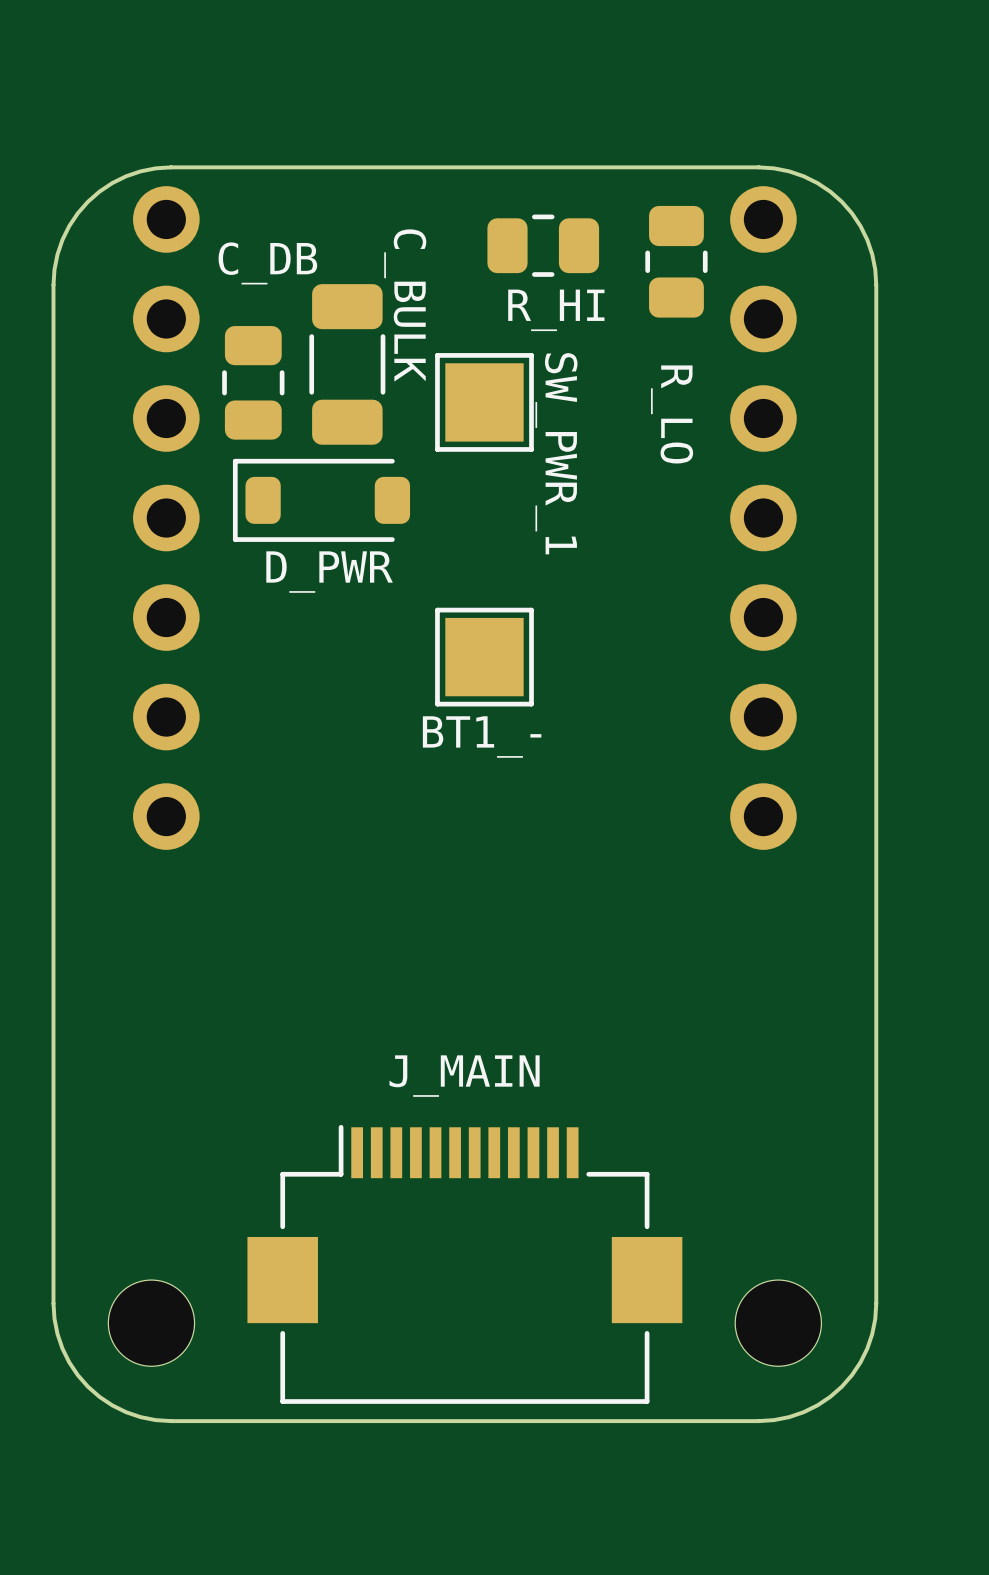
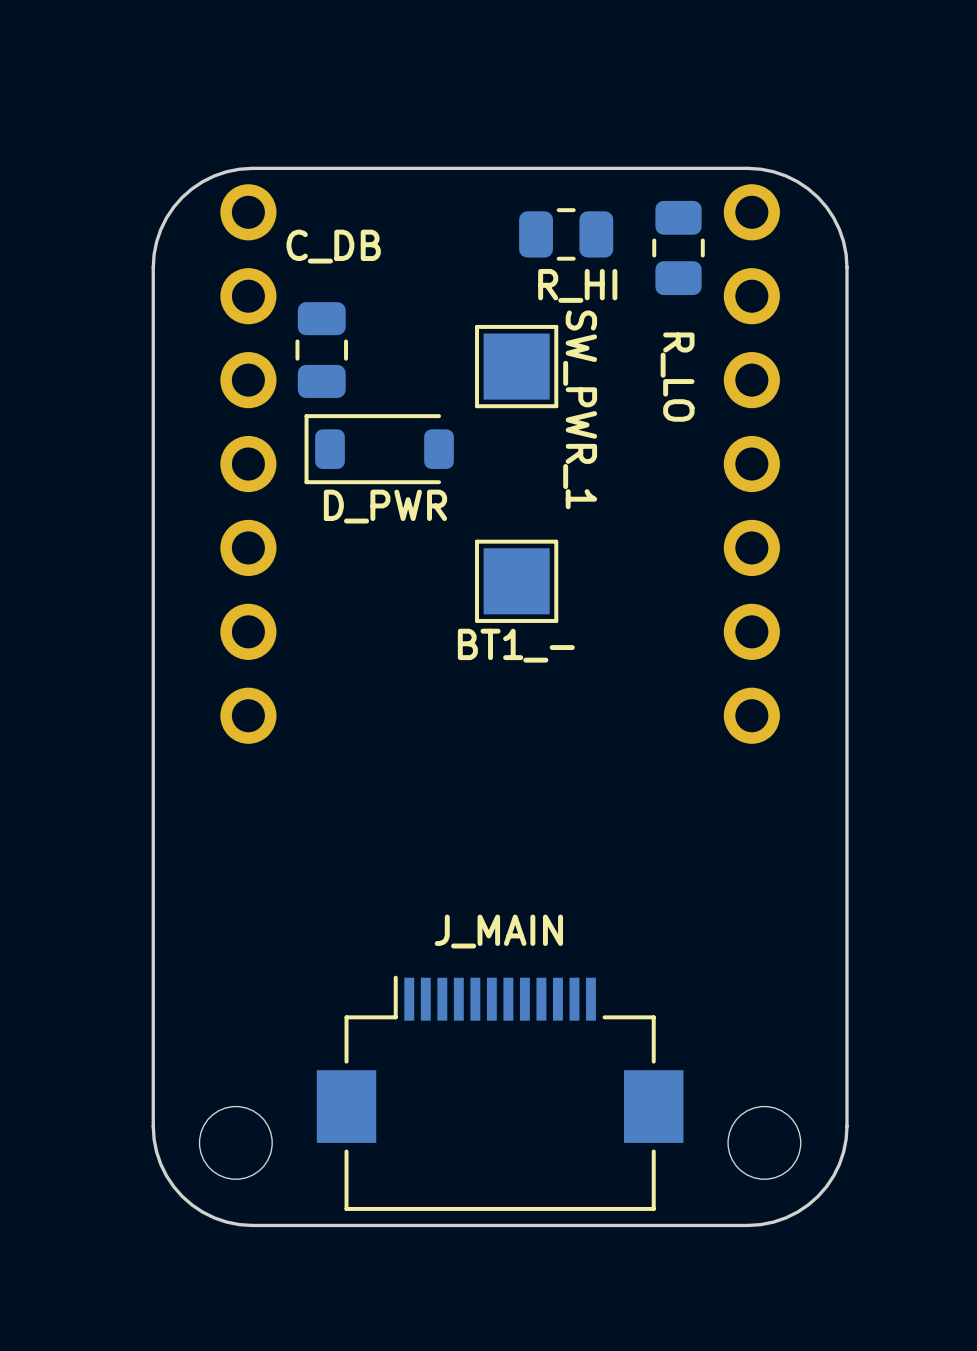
C_BULK: (347, 364) -> none

